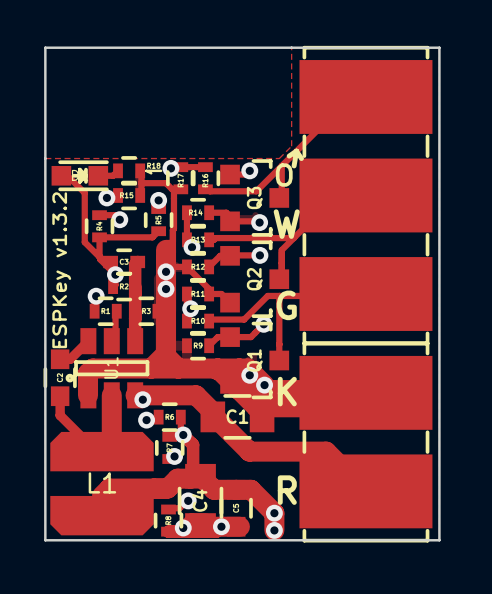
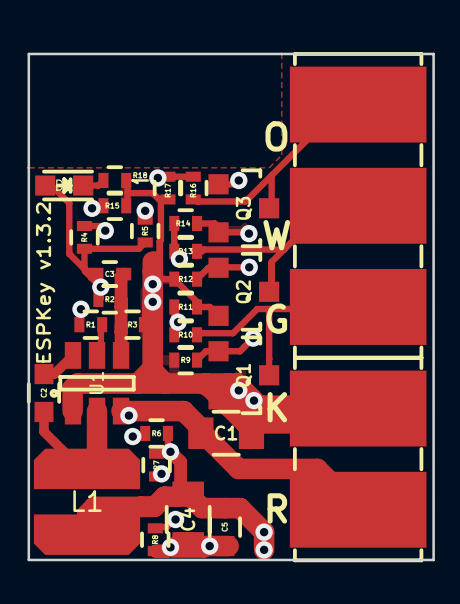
line: (296, 151) (294, 165) -> none
line: (296, 151) (301, 158) -> none
line: (296, 151) (289, 156) -> none
text position: O (284, 175) -> O (276, 136)

